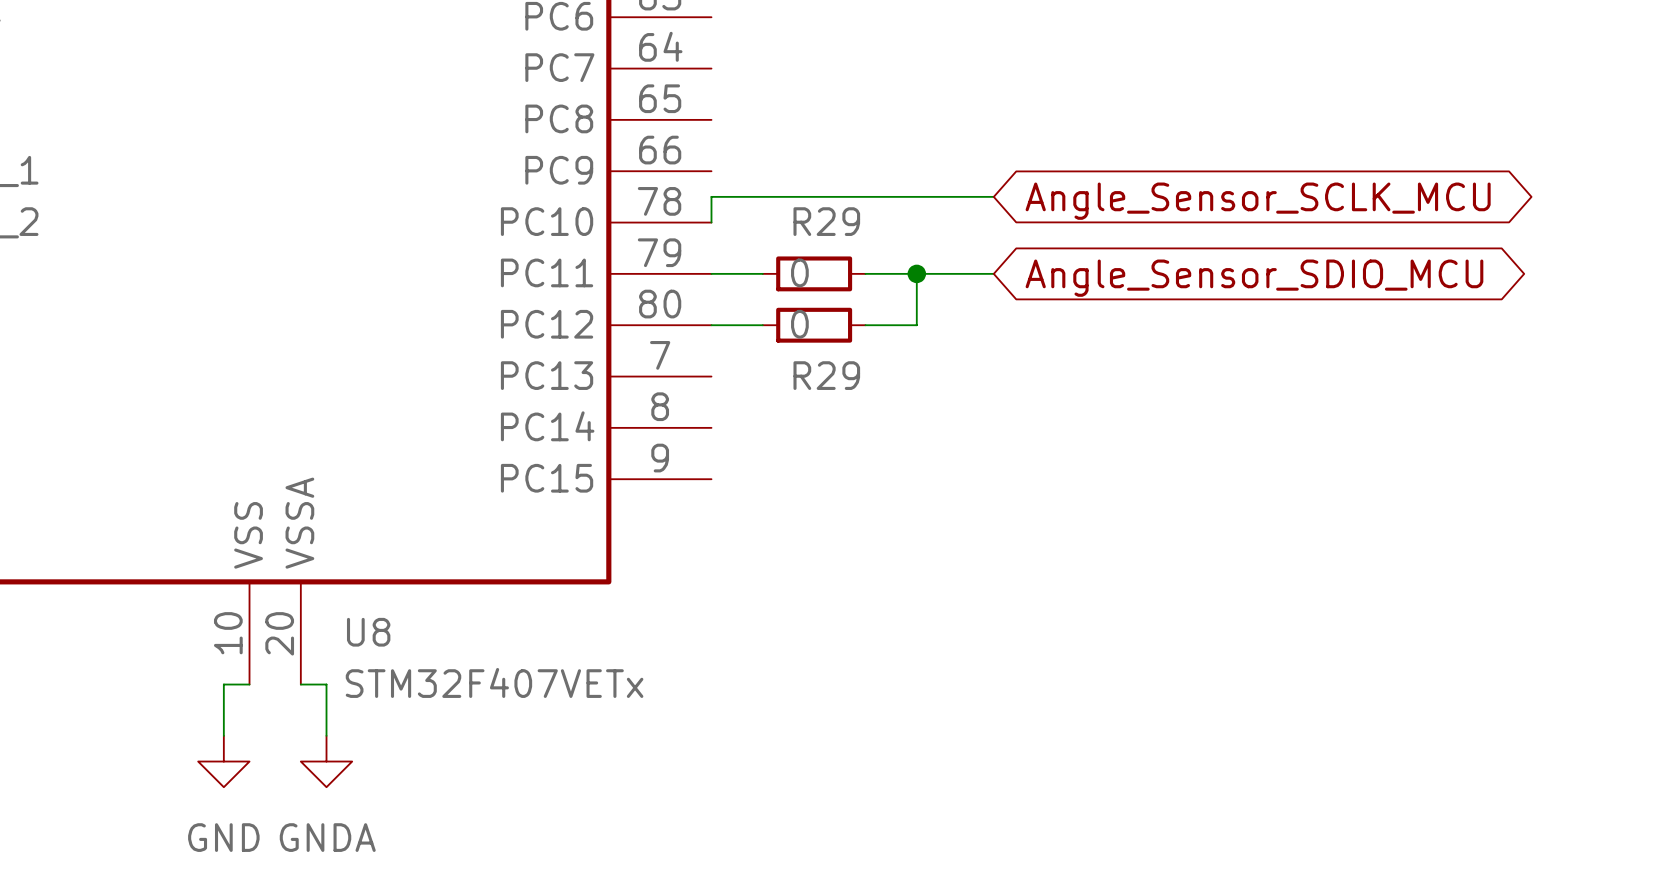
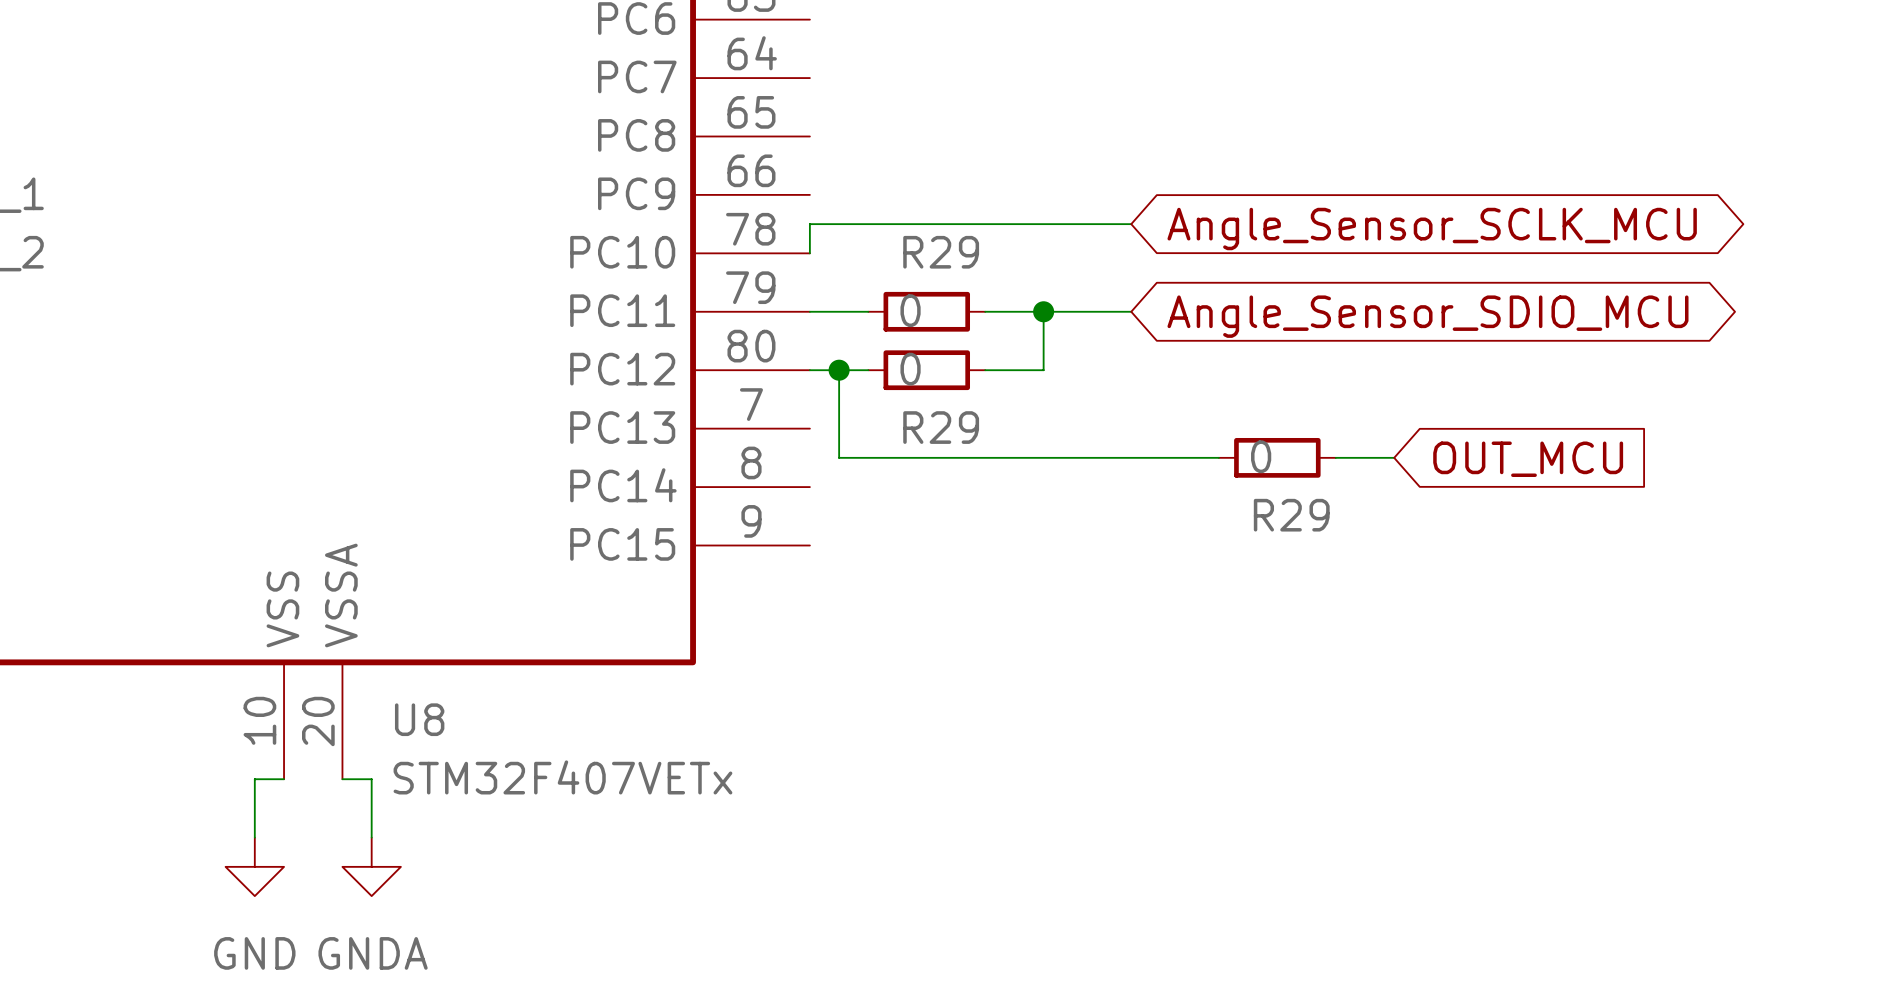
wire: none -> (839, 370) (839, 457) (1218, 457)
junction: none -> (839, 370)
R29: none -> 0 (1277, 457)
wire: none -> (1335, 457) (1394, 457)
global label: none -> OUT_MCU (1528, 459)

